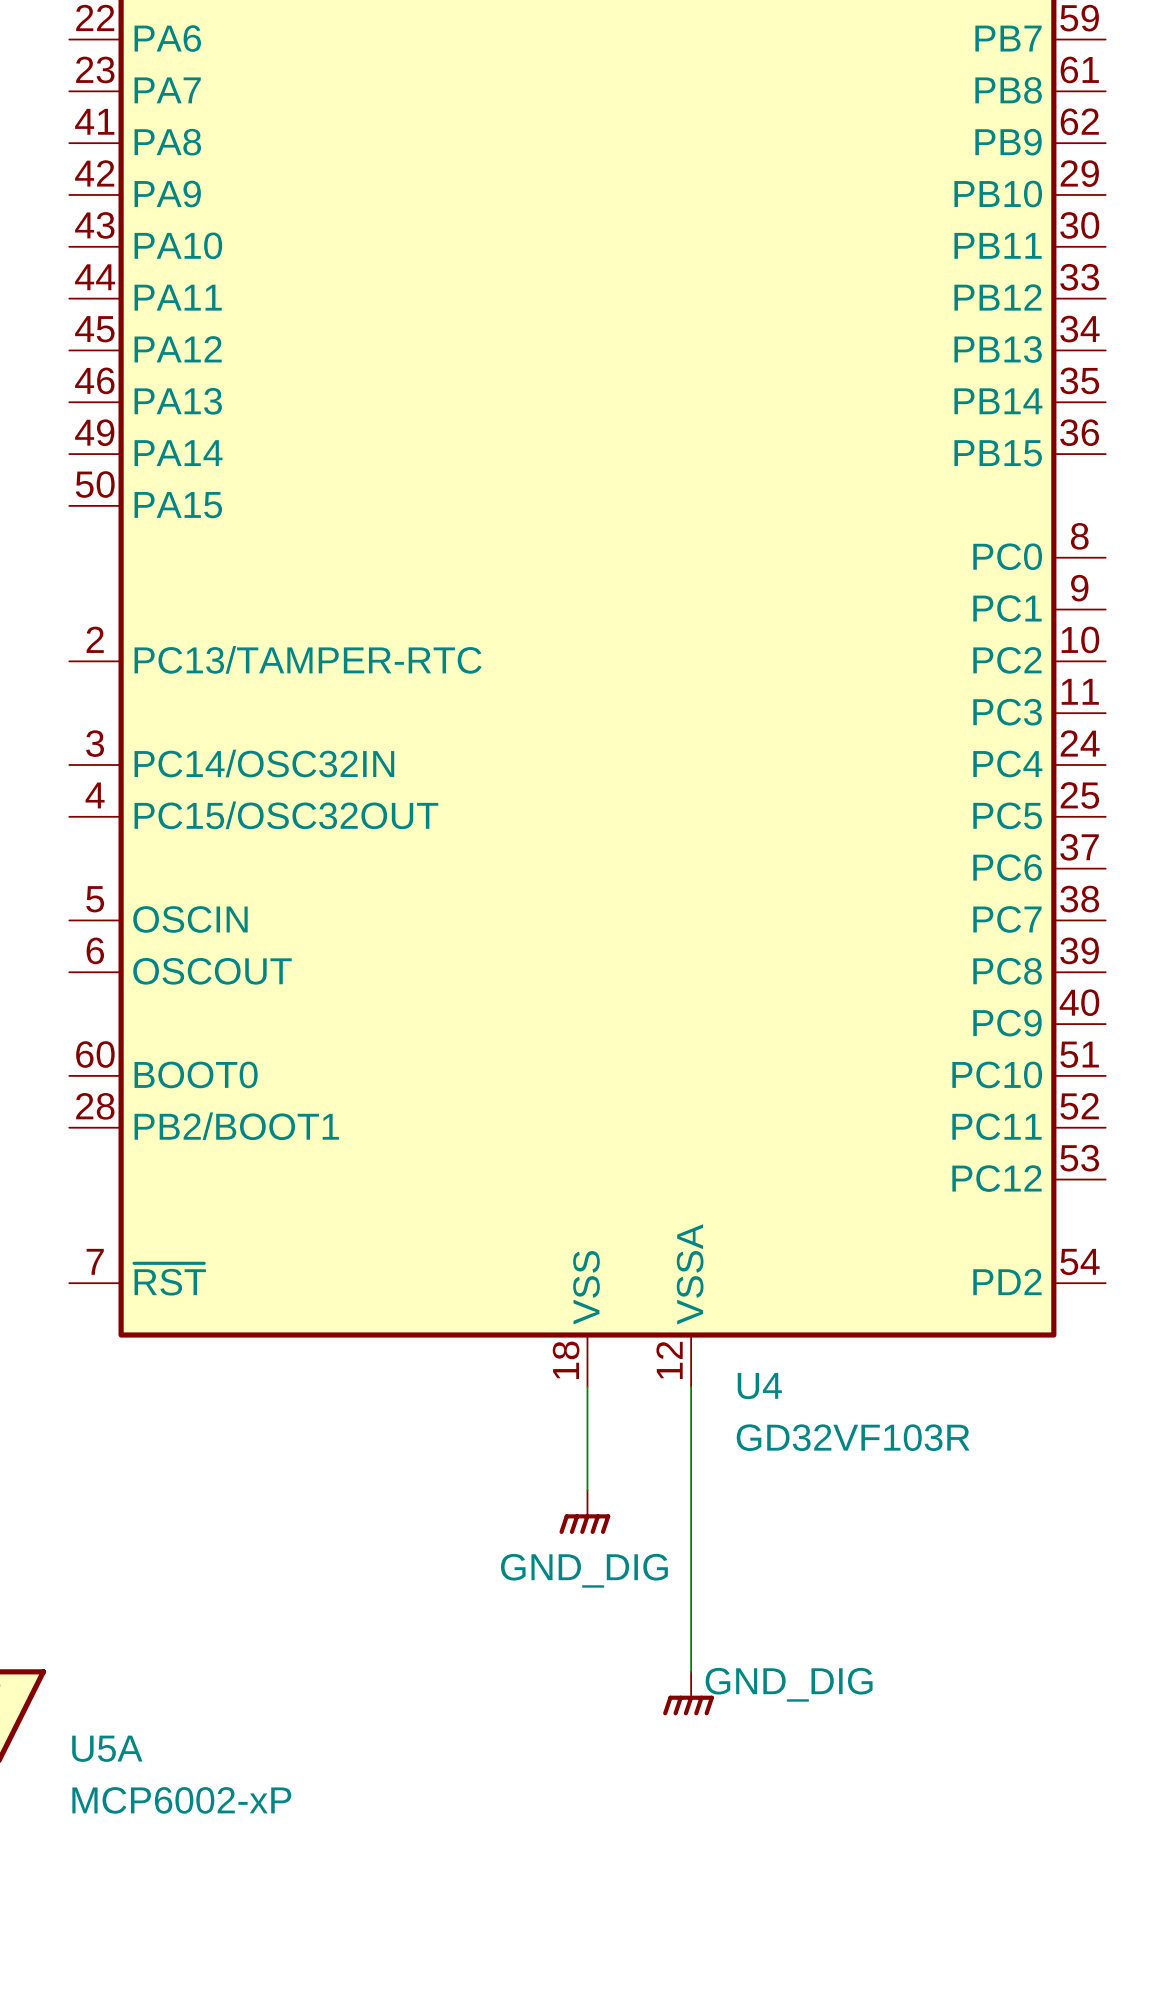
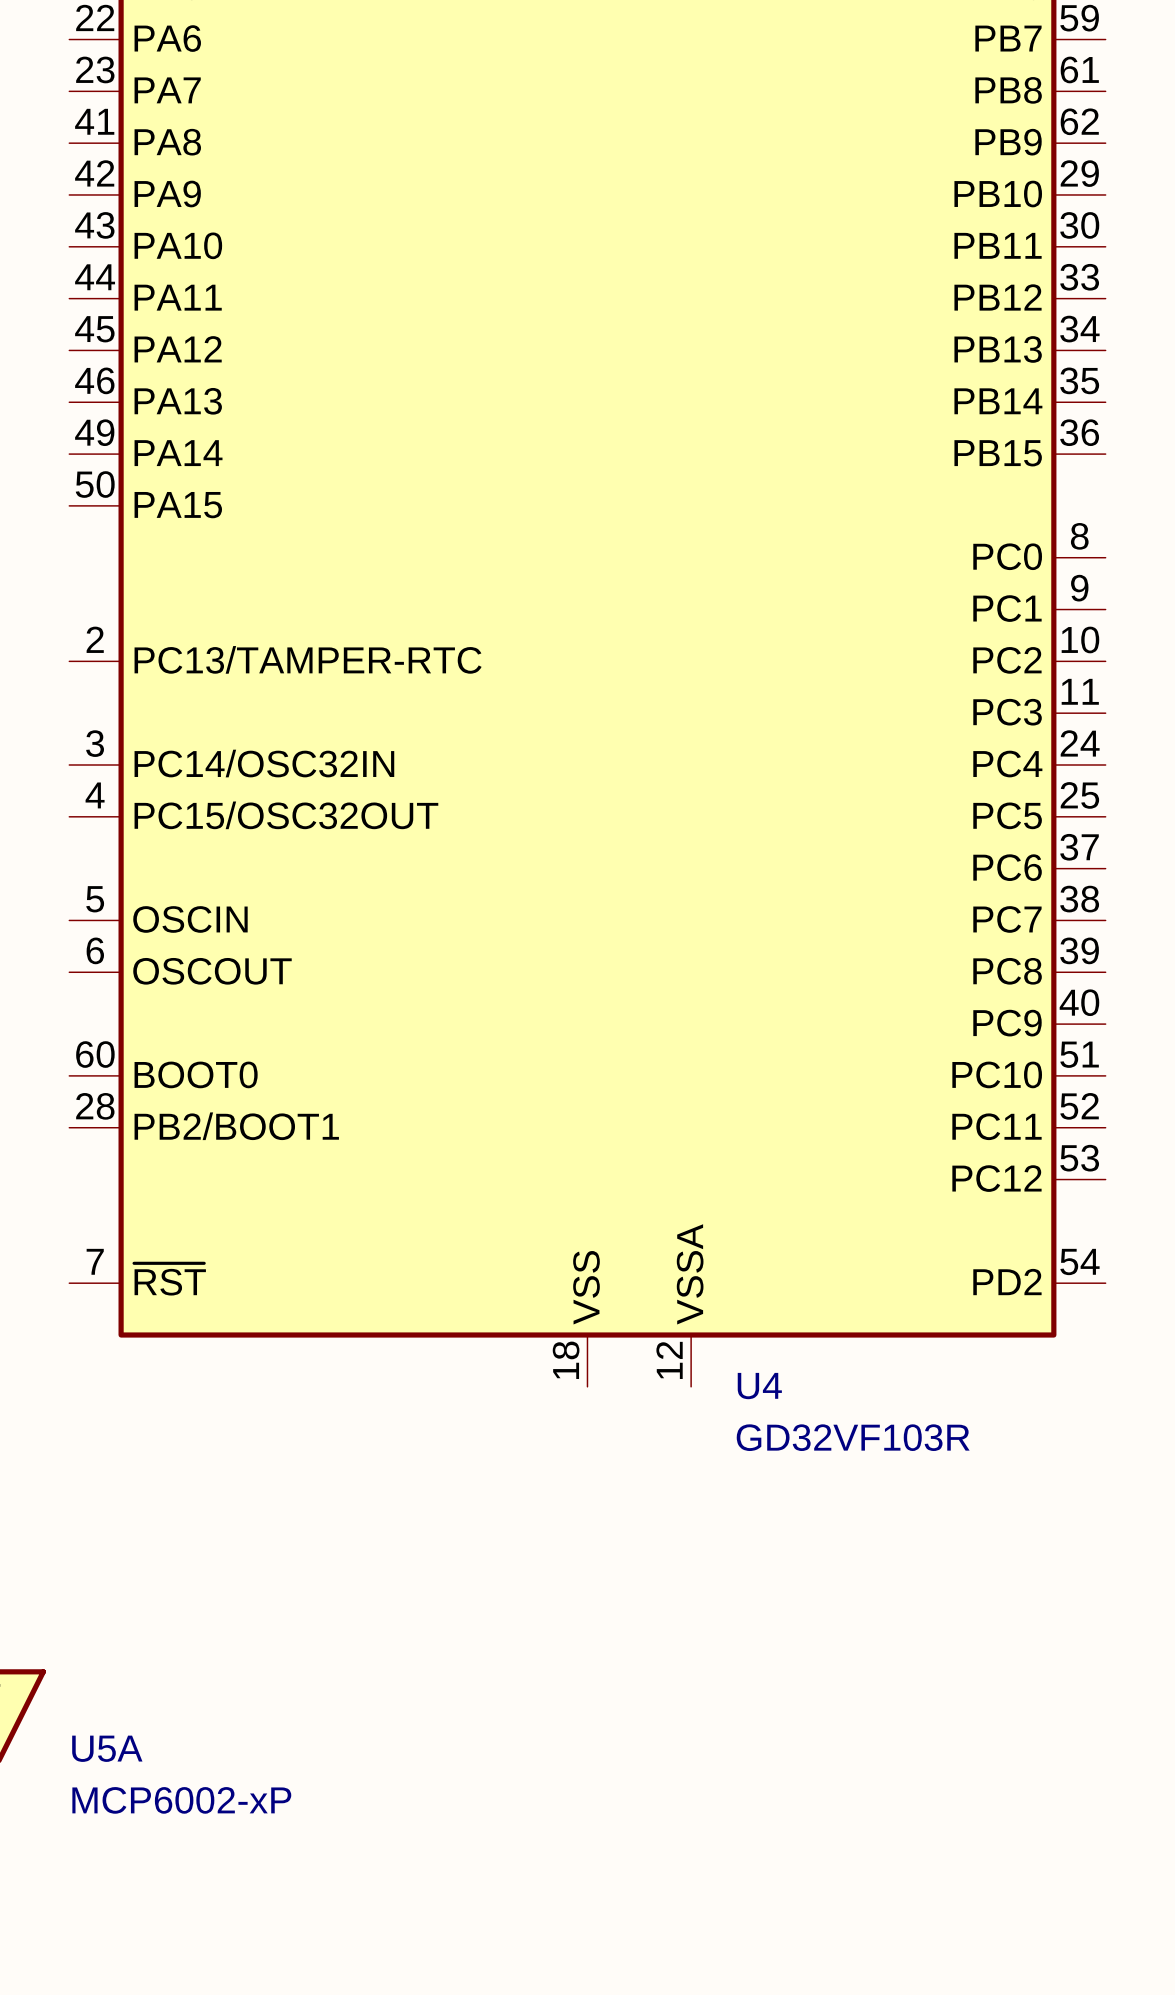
wire: (587, 1386) (587, 1490) -> none
wire: (691, 1386) (691, 1671) -> none
power symbol: GND_DIG (584, 1512) -> none
power symbol: GND_DIG (688, 1693) -> none

